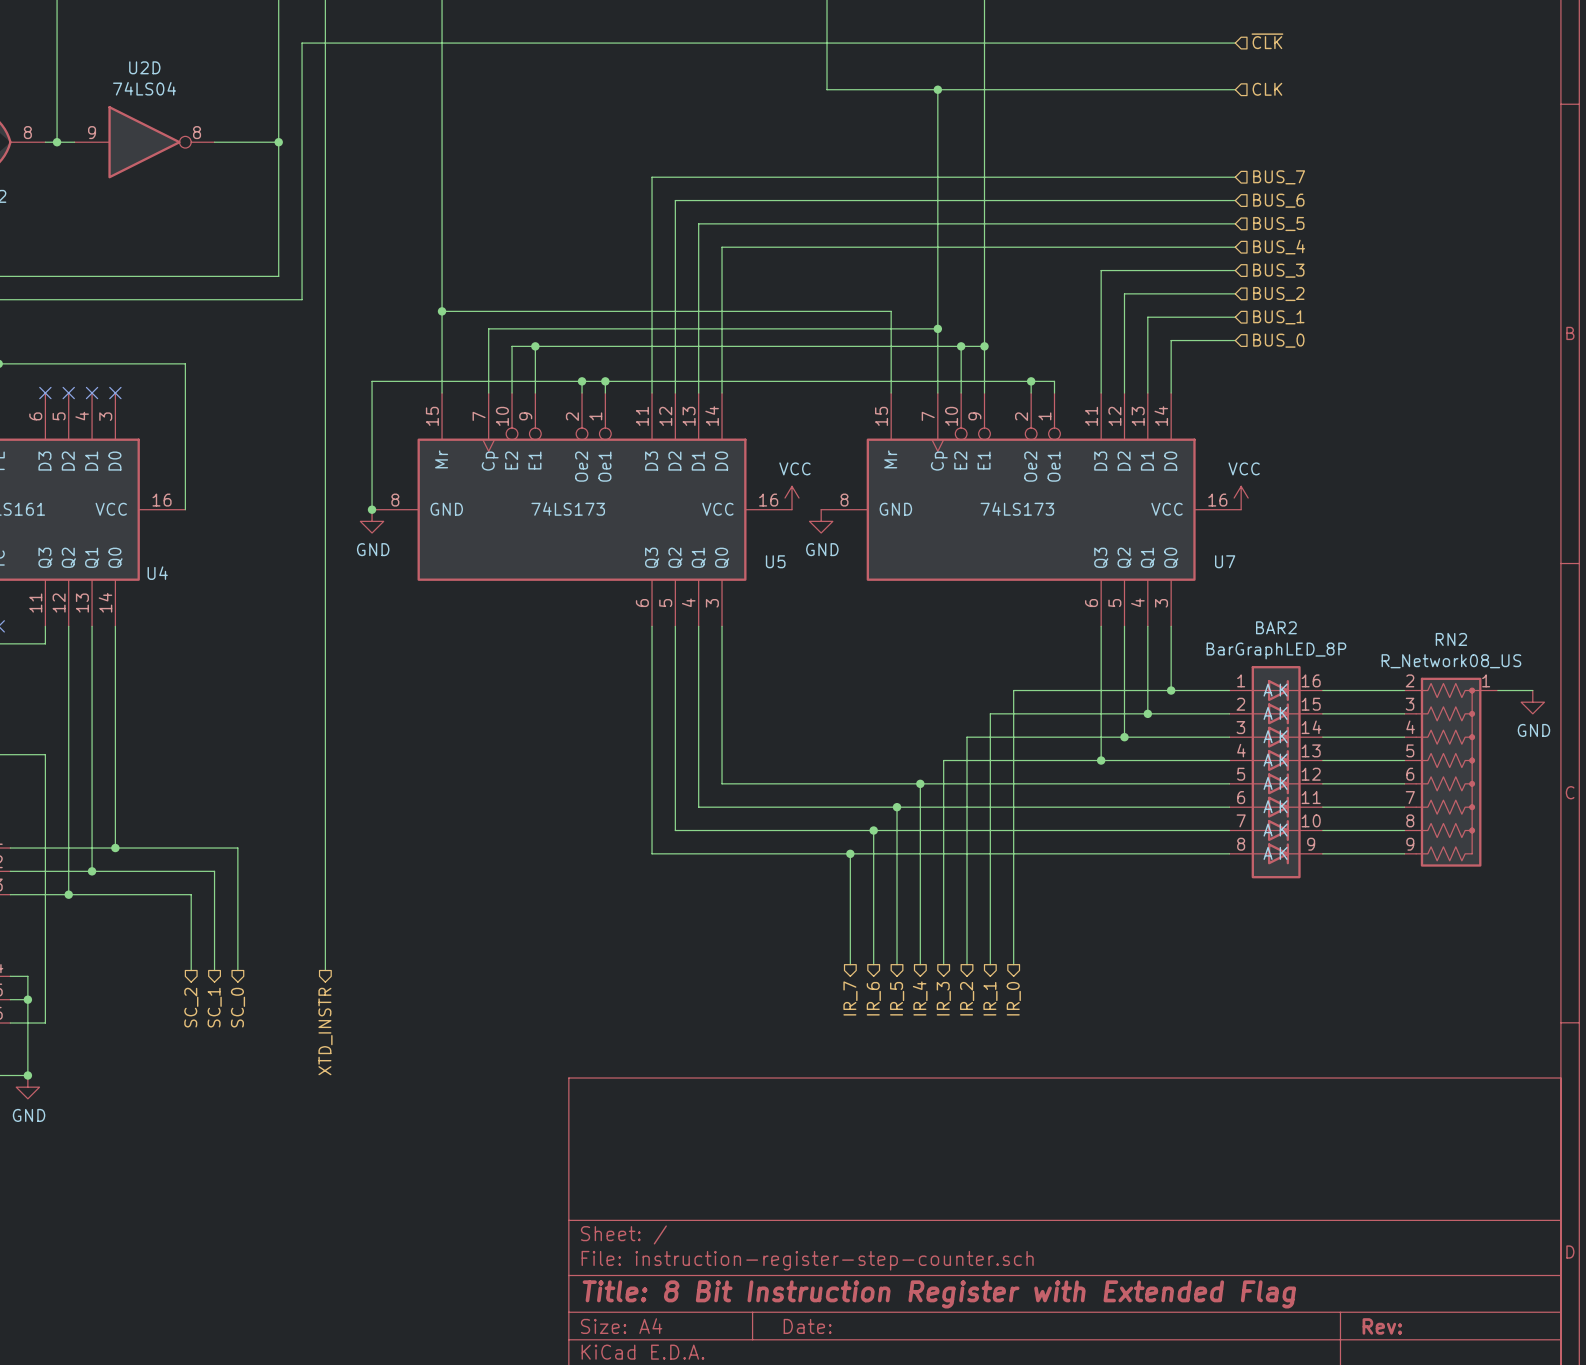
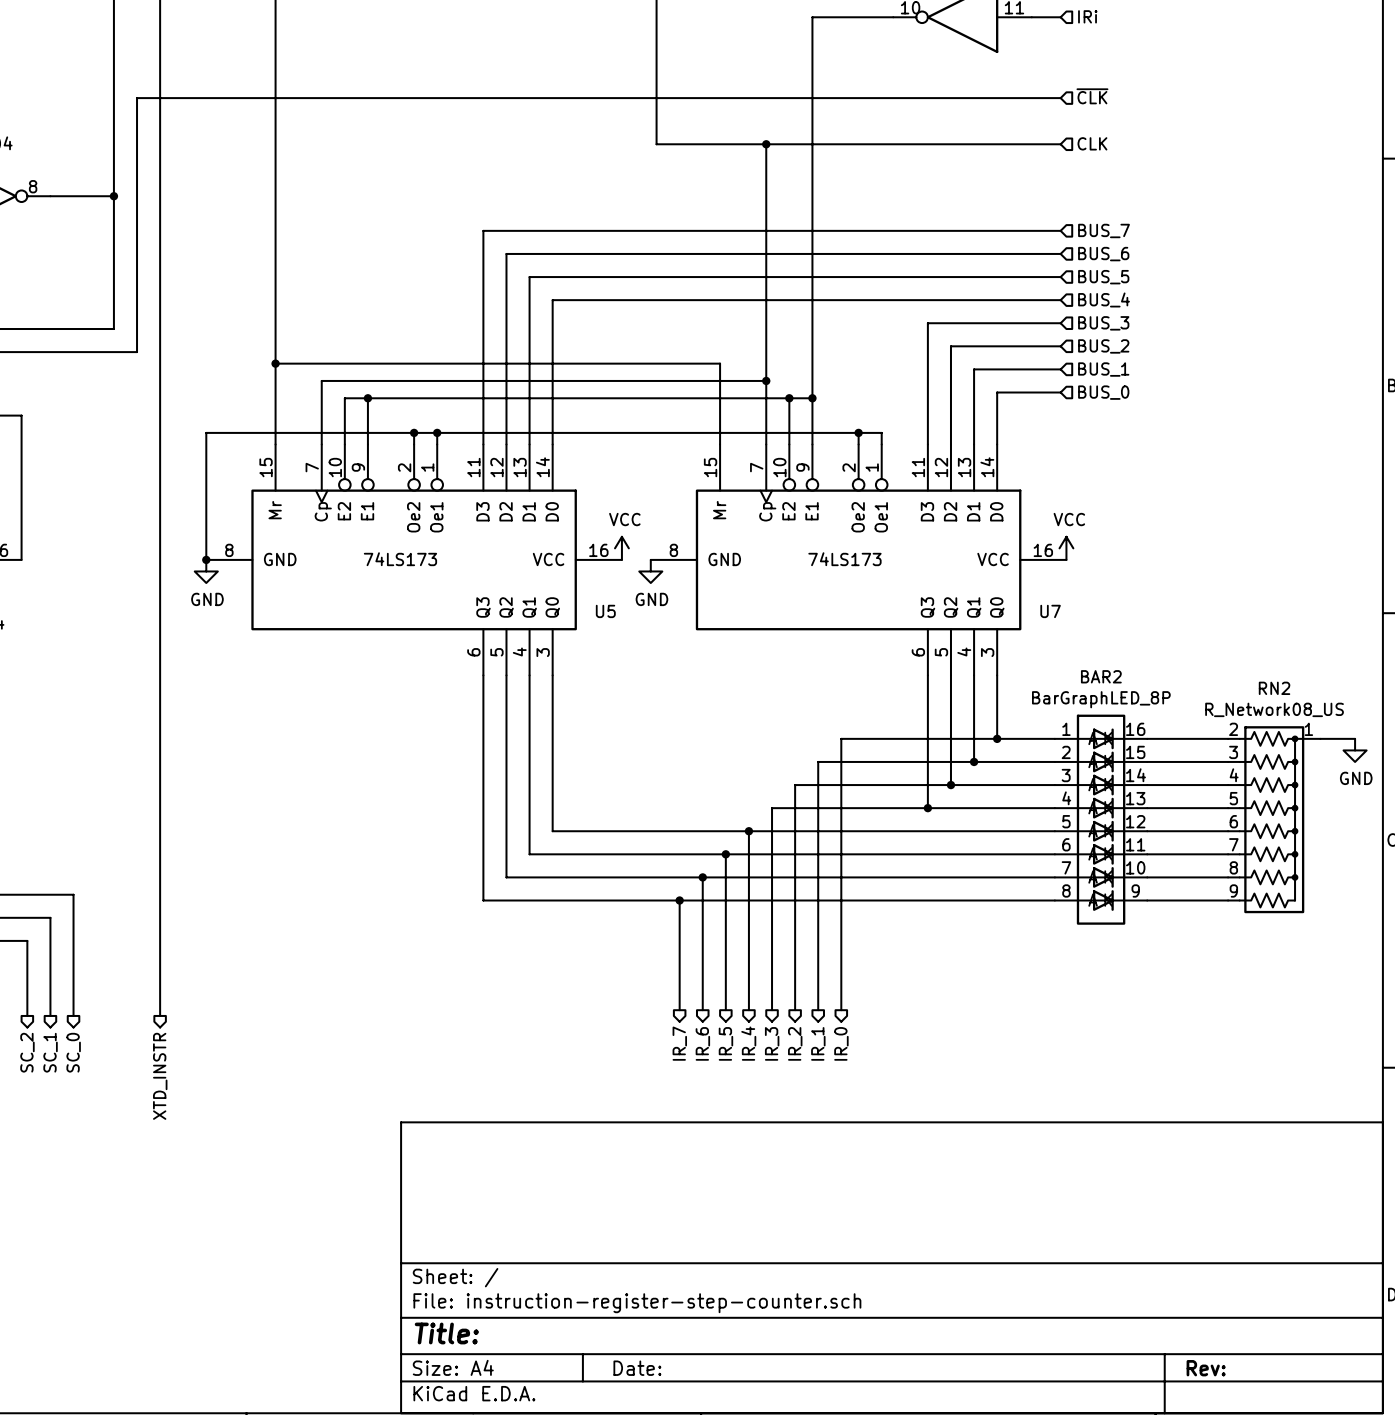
title block: Title: 8 Bit Instruction Register with Extended Flag (939, 1294) -> Title: (446, 1333)

